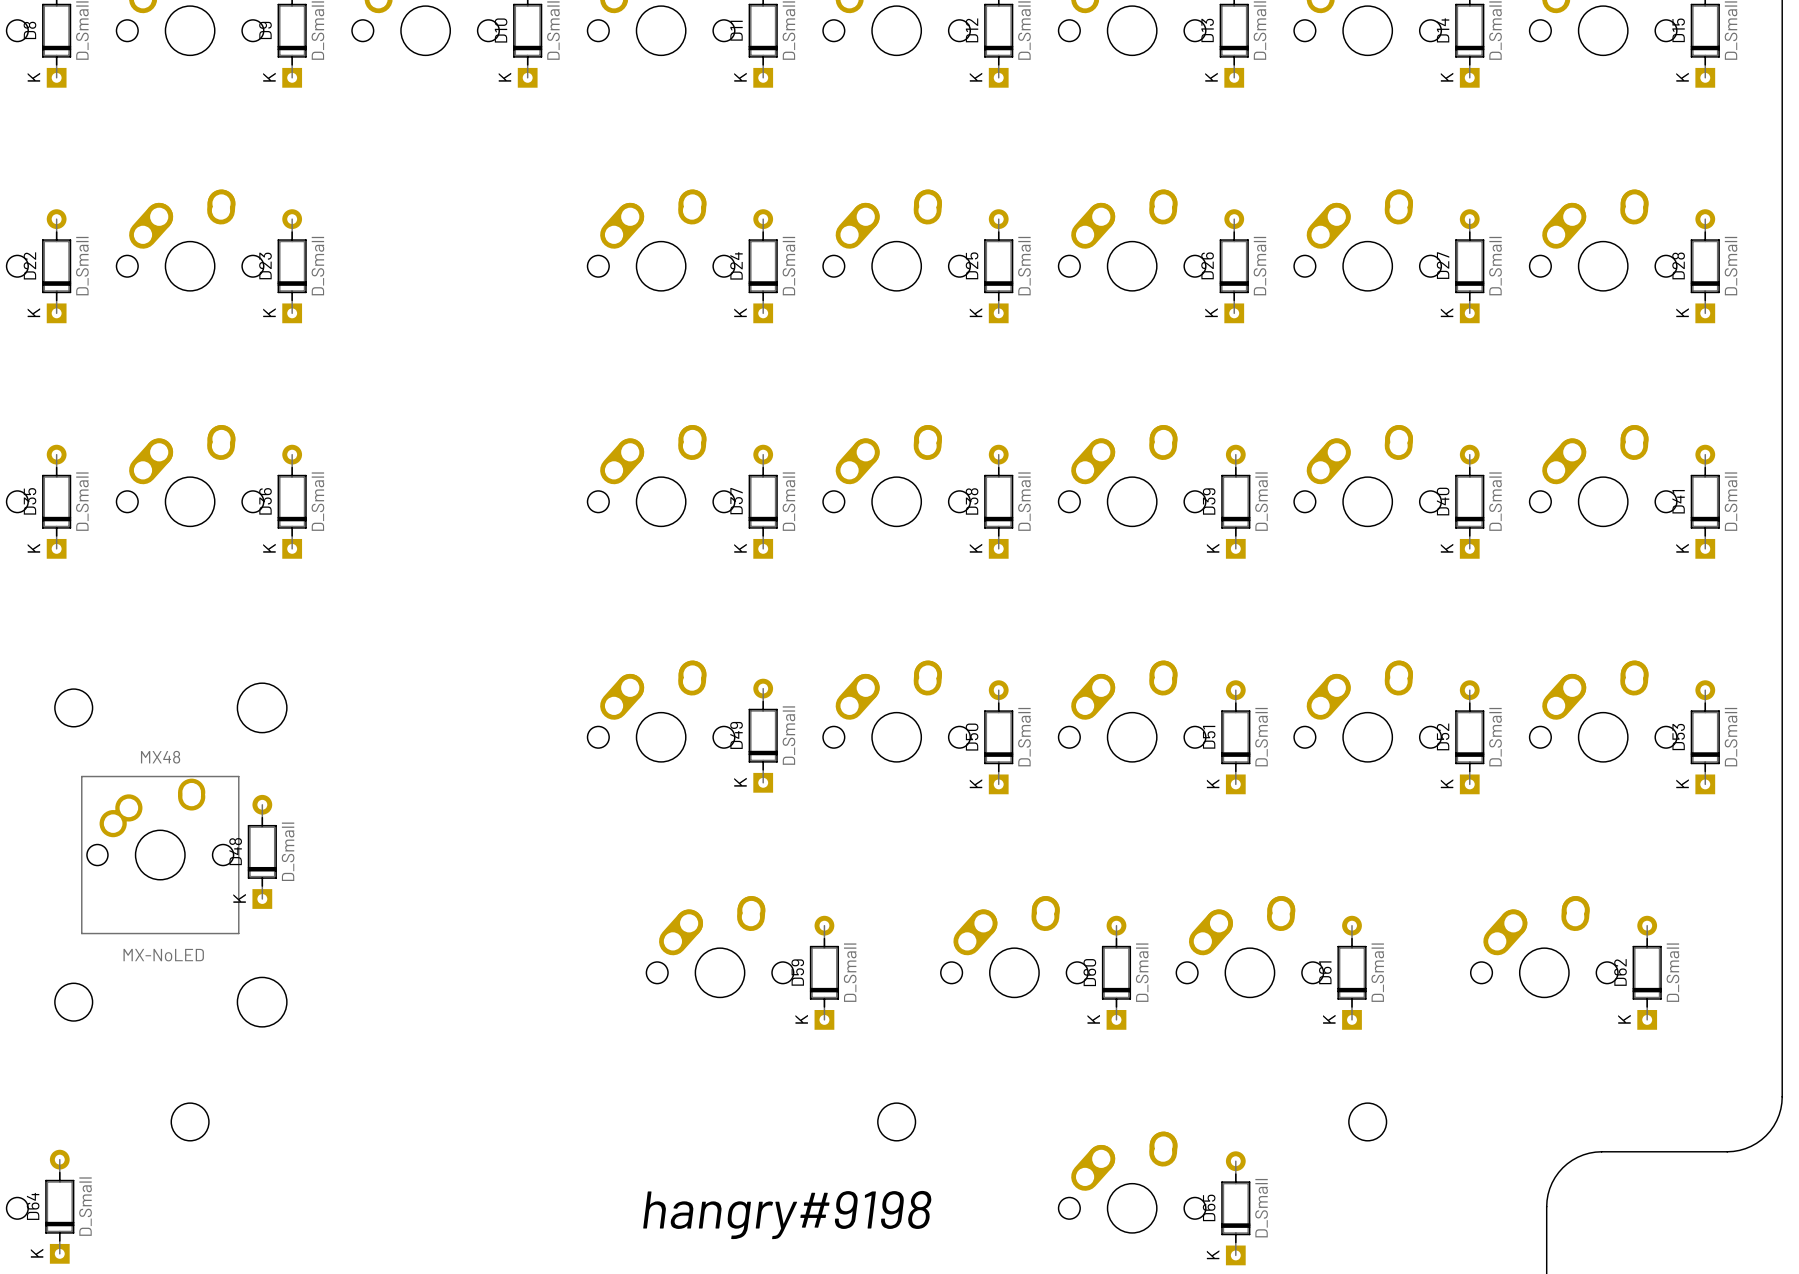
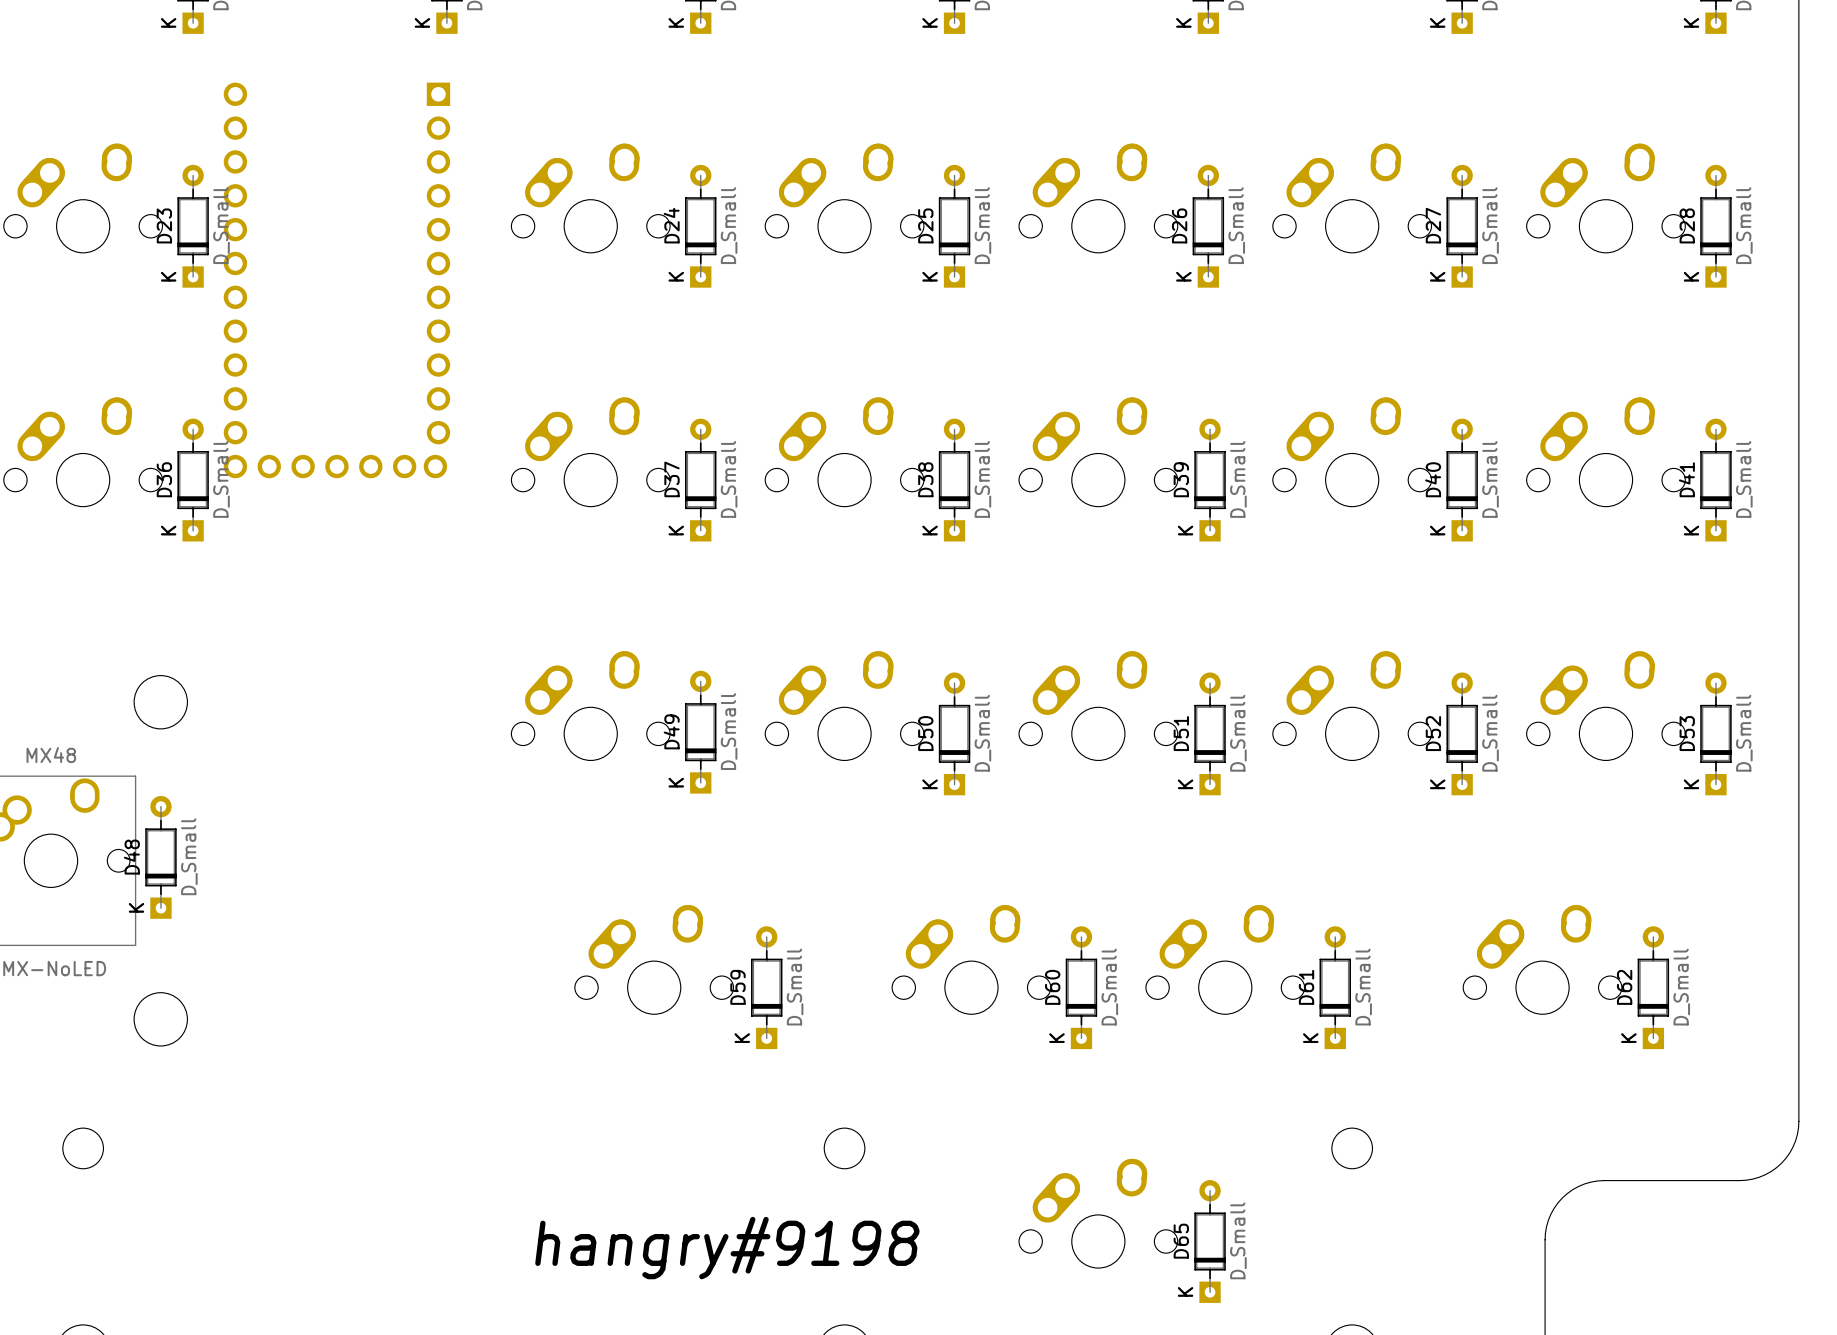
part: none -> (336, 280)

